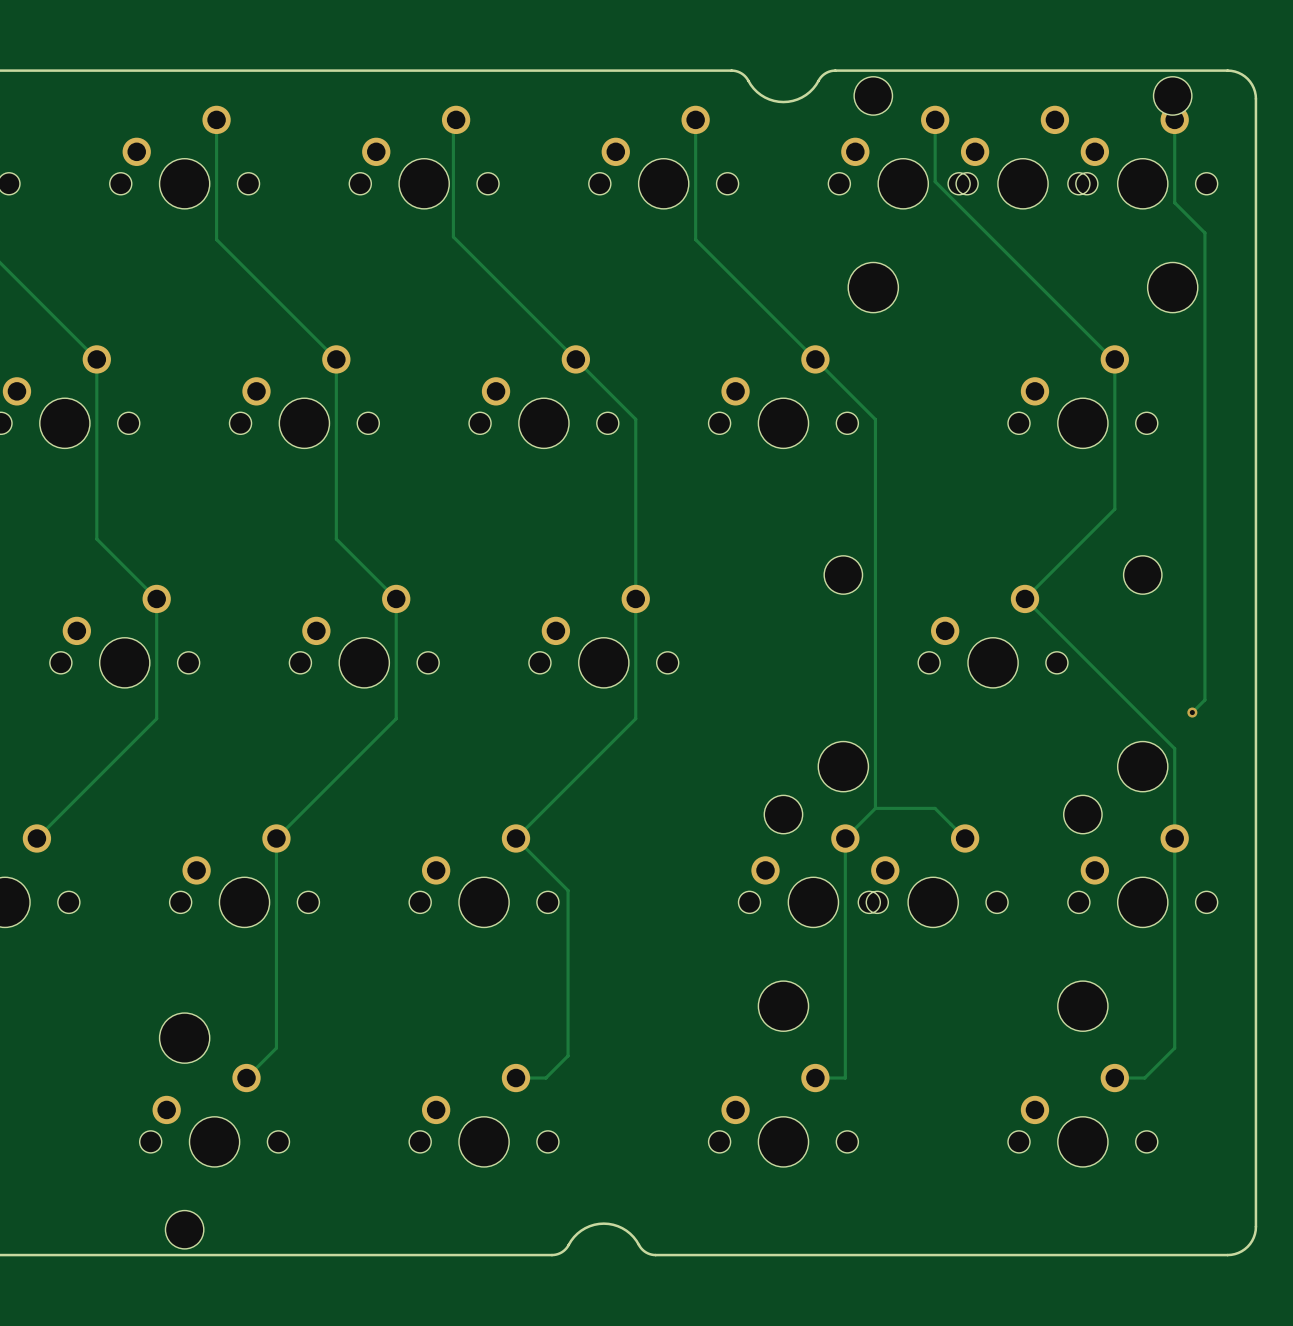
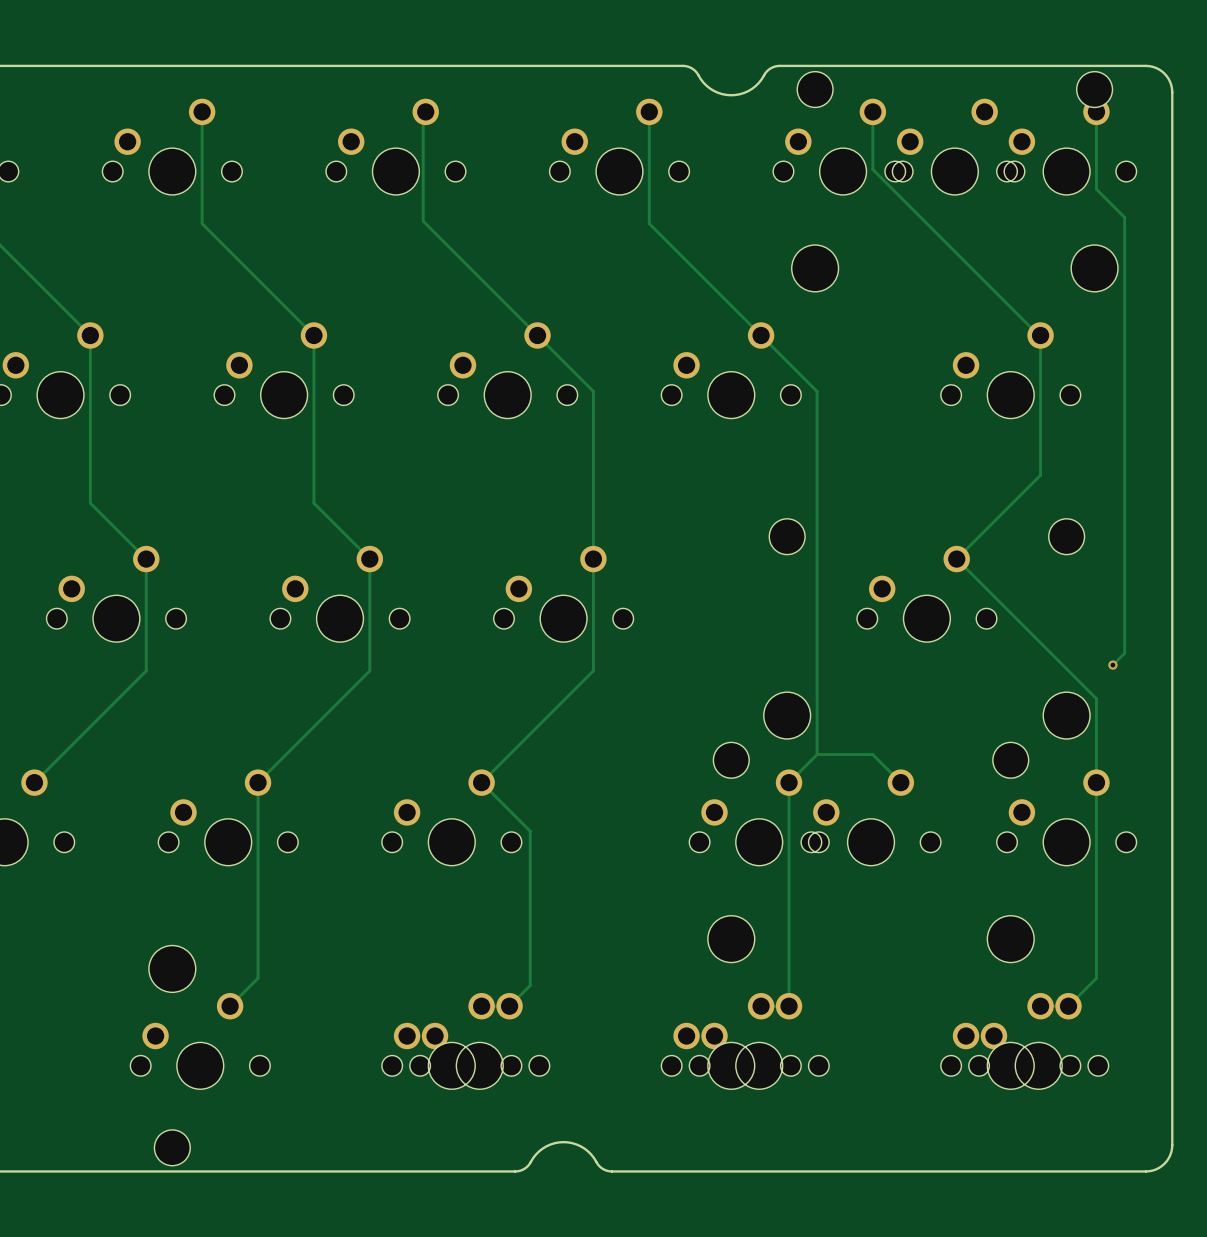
part: none -> (479, 1041)
part: none -> (759, 1041)
part: none -> (1038, 1041)

